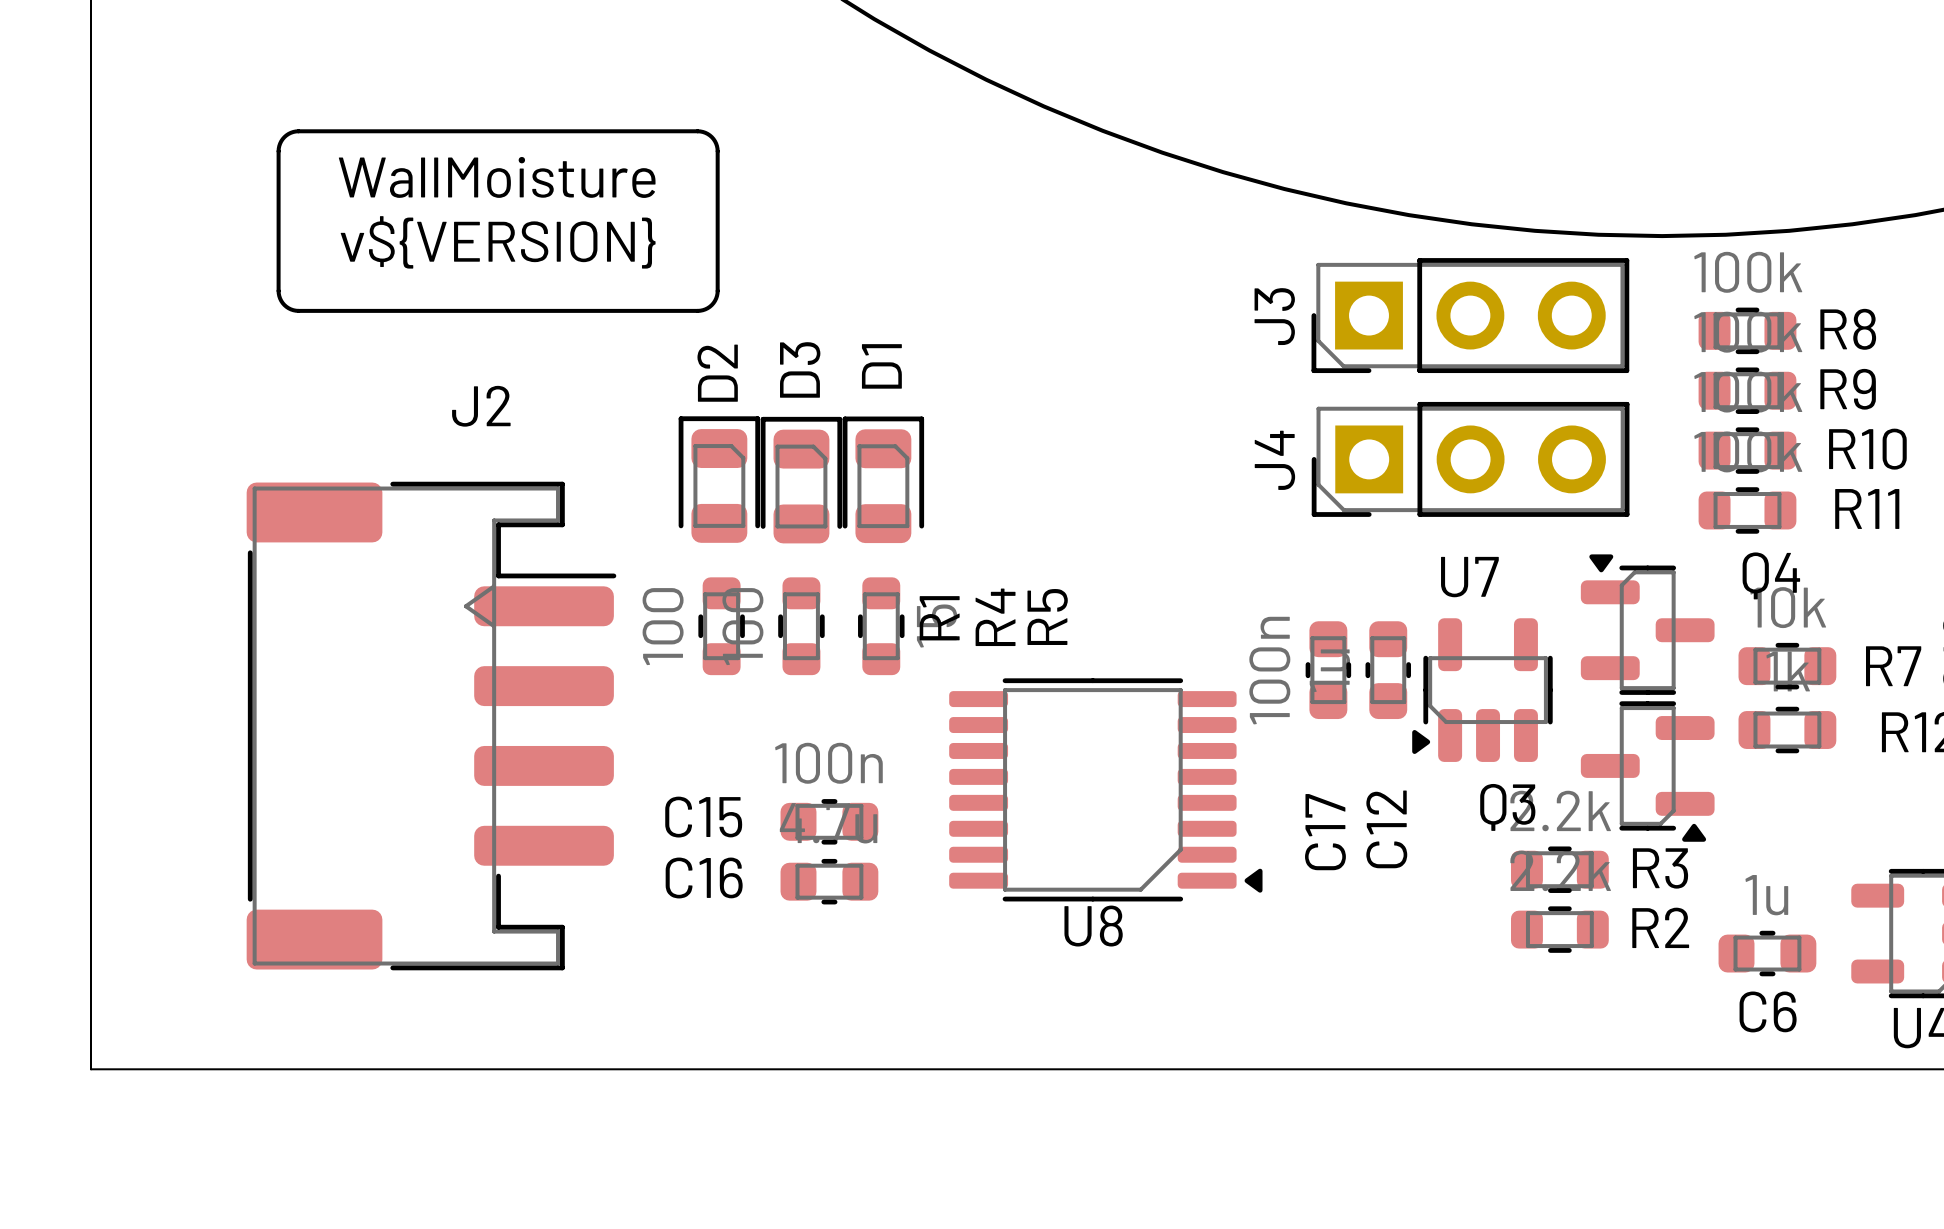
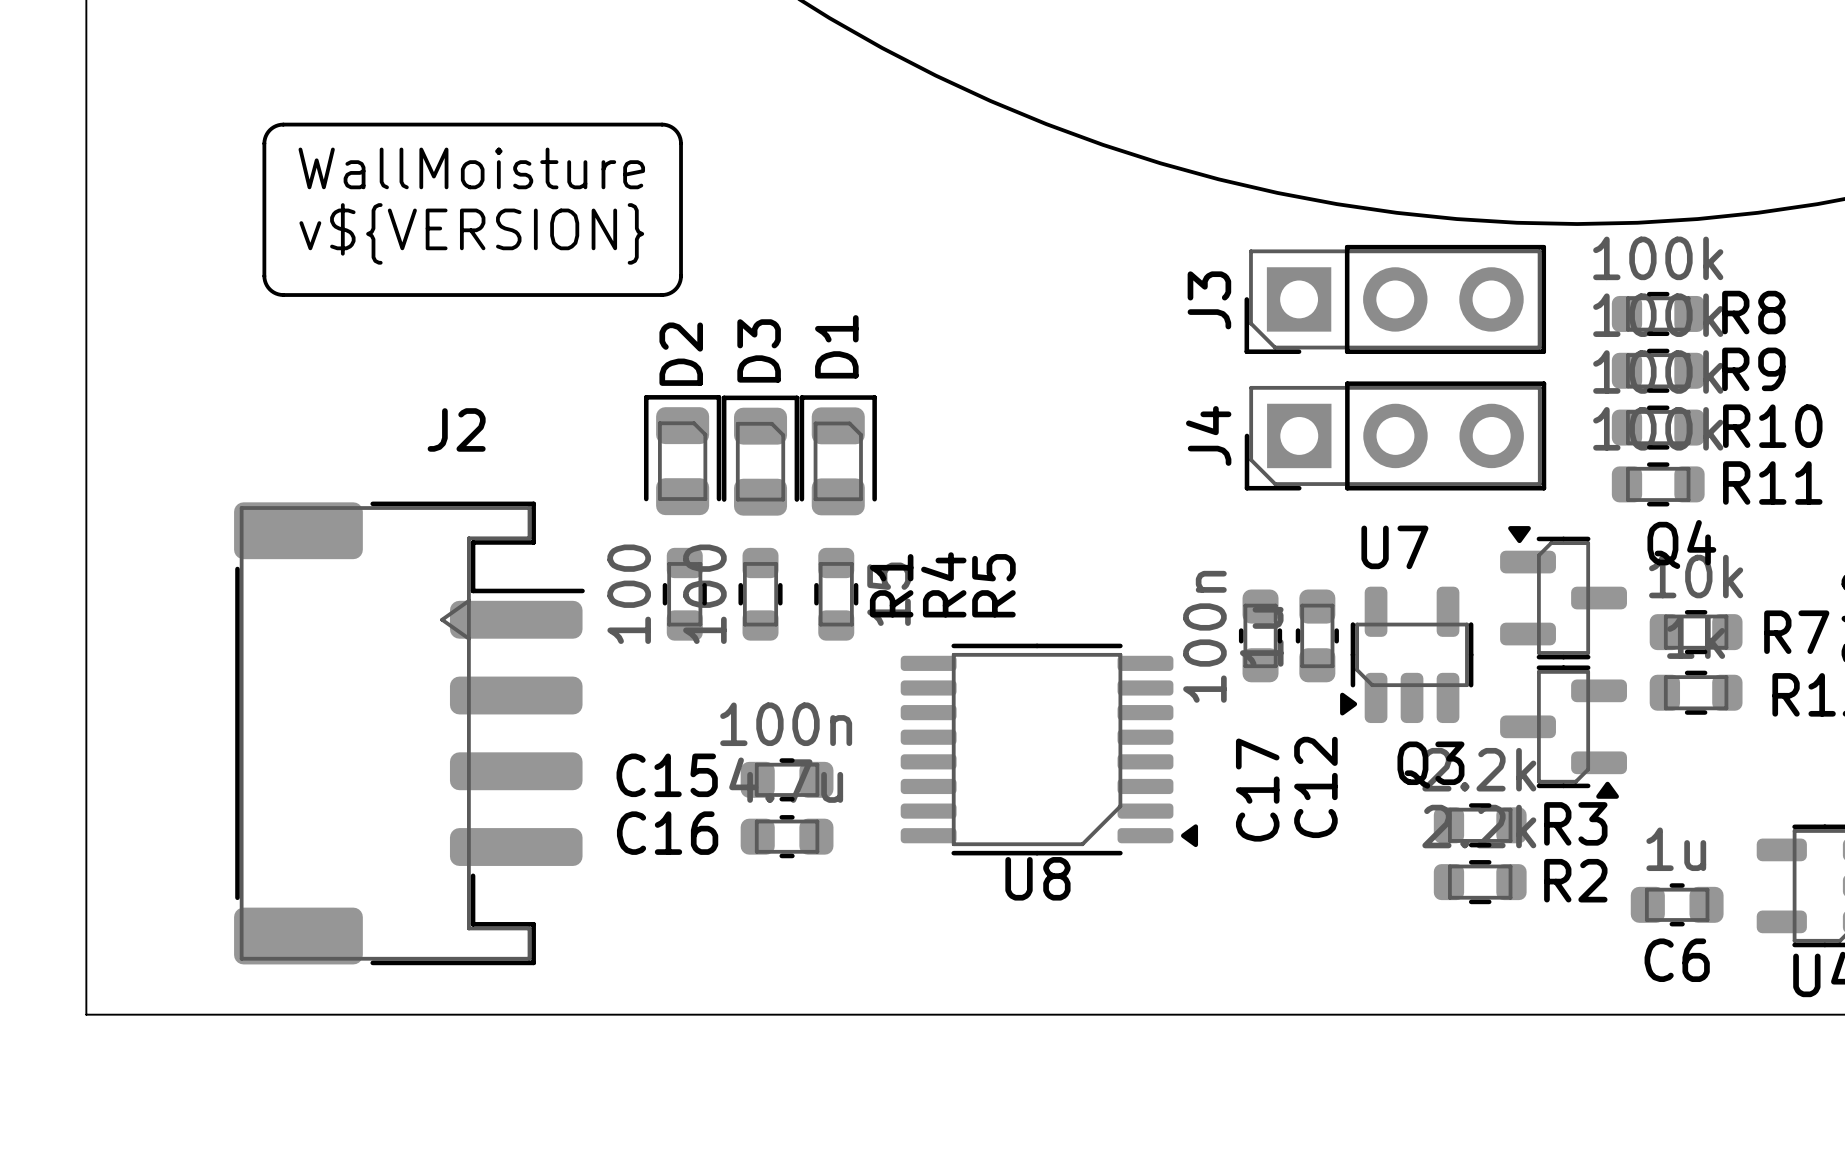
J2 position: (431, 726) -> (409, 733)

